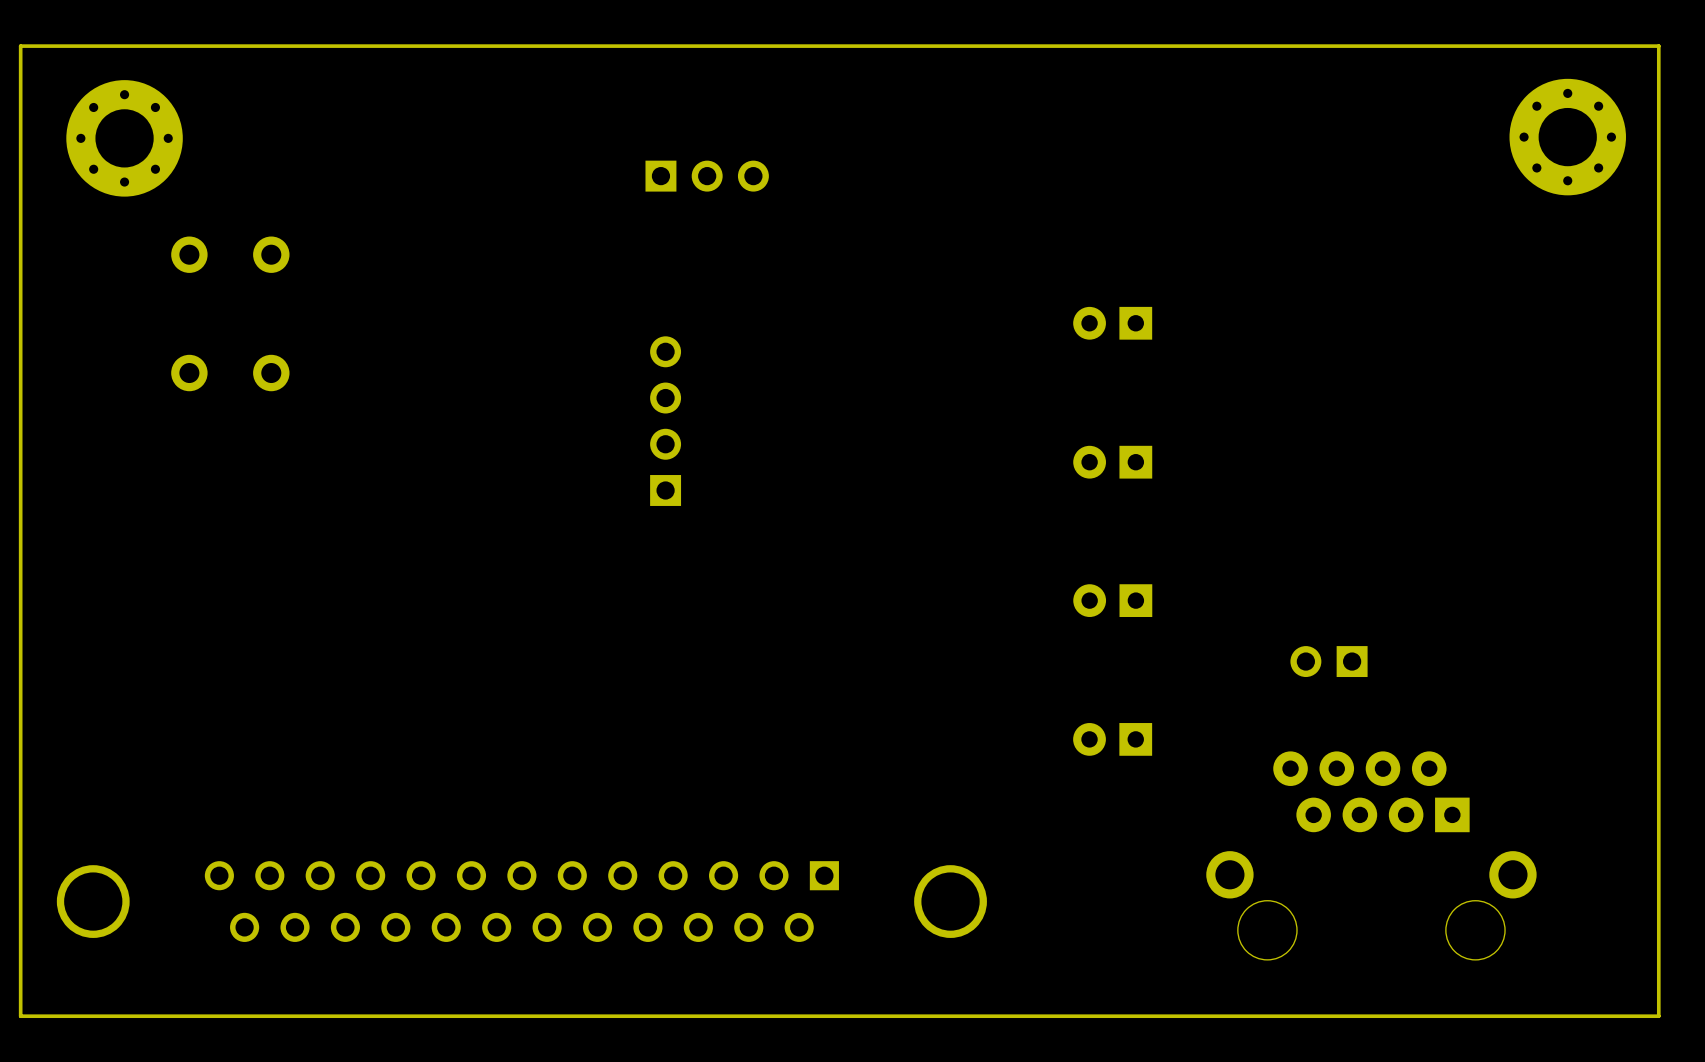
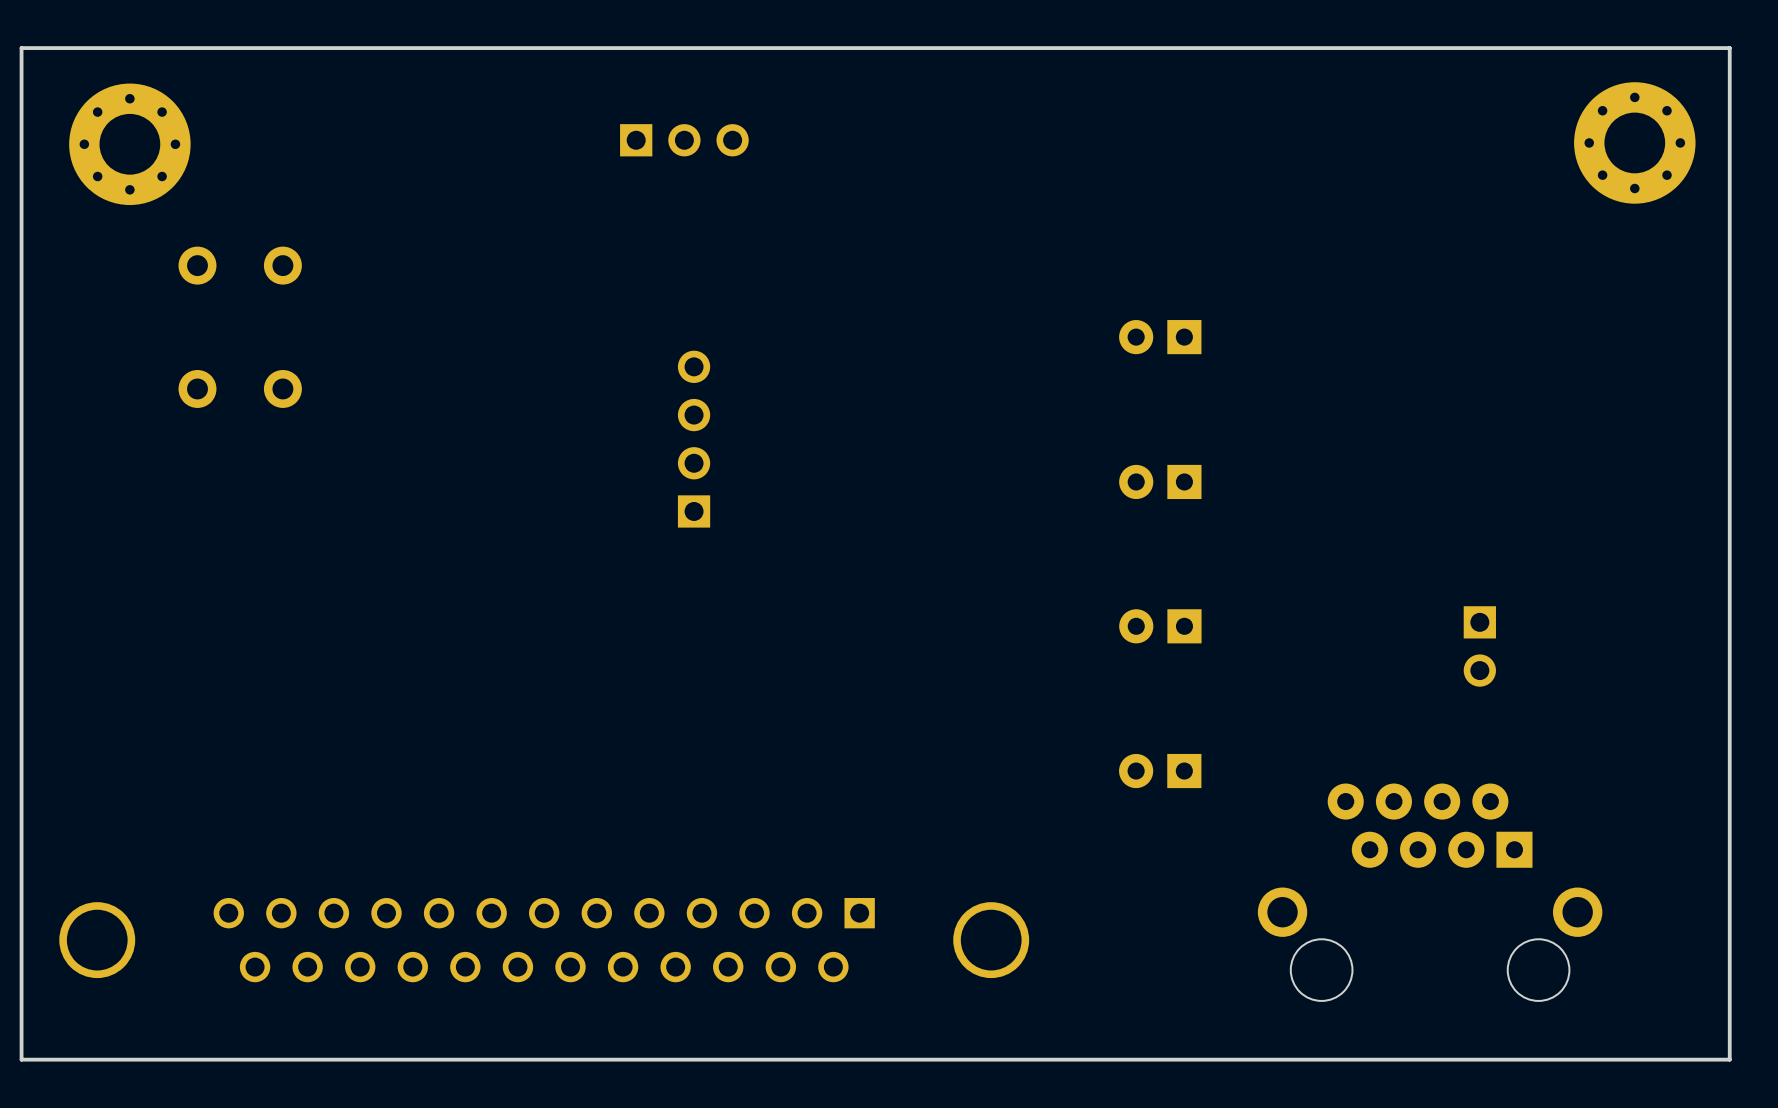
part position: (707, 176) -> (684, 140)
part rotation: 0° (1329, 661) -> 90° counterclockwise (1479, 646)
part position: (1329, 661) -> (1479, 646)

